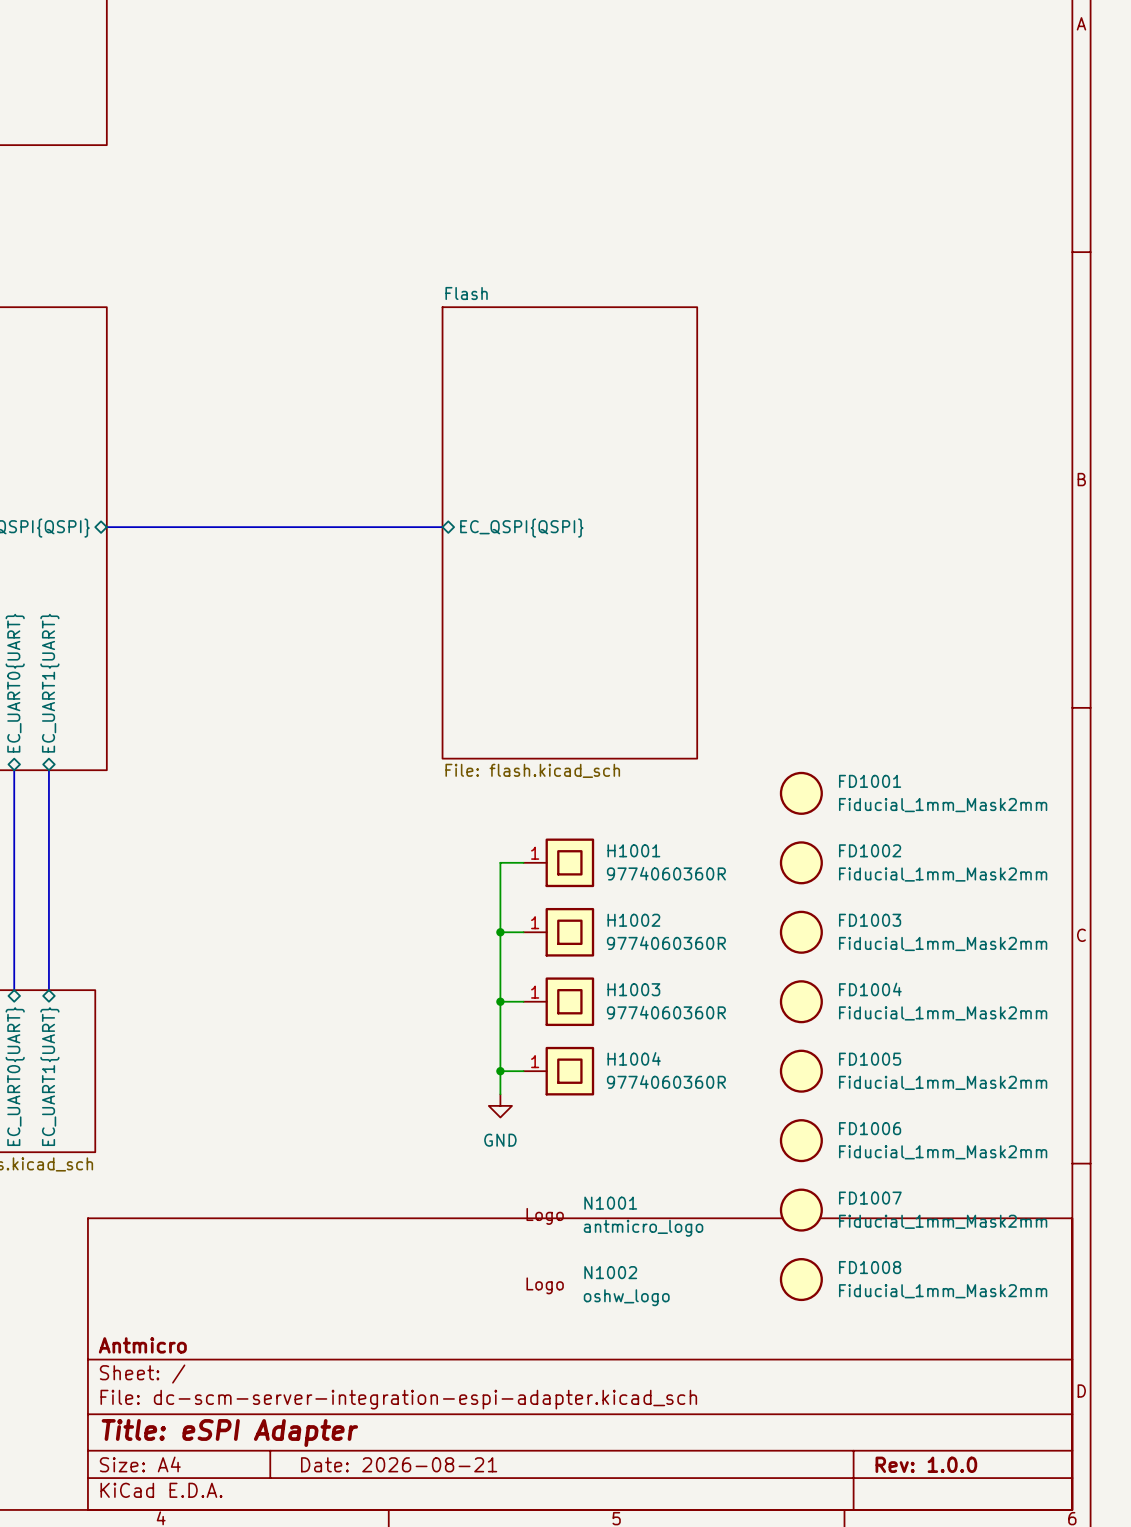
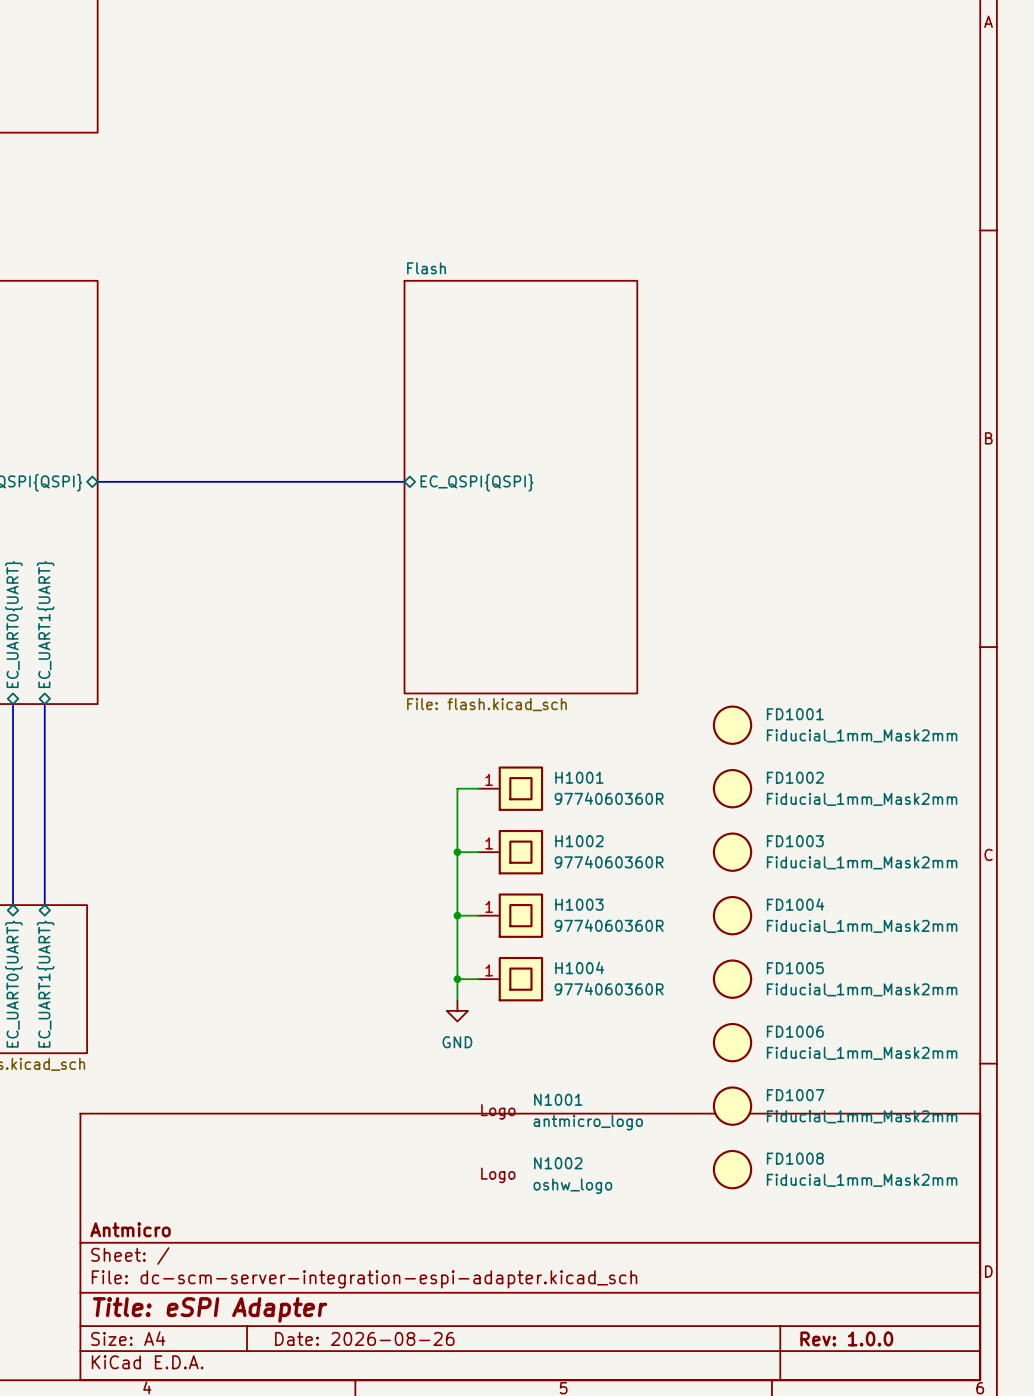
title block: Date: 2026-08-21 (399, 1464) -> Date: 2026-08-26 (364, 1338)

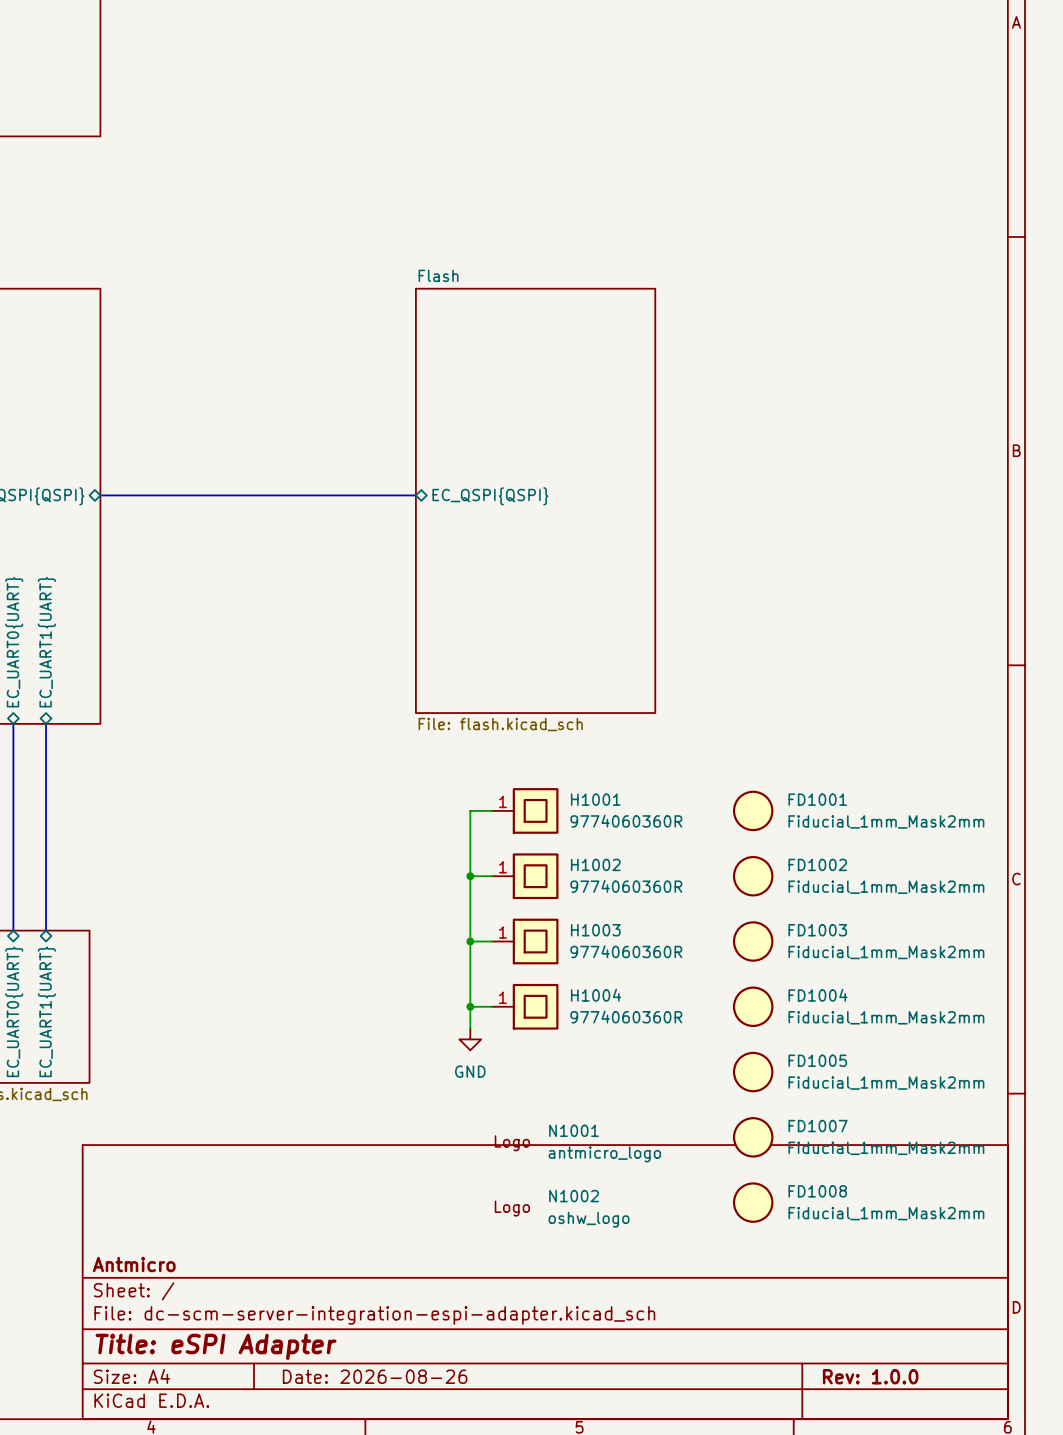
FD1001: Fiducial_1mm_Mask2mm (732, 725) -> none
FD1002 name: FD1002 (795, 777) -> FD1001 (817, 799)
FD1003 name: FD1003 (795, 841) -> FD1002 (817, 864)
FD1004 name: FD1004 (795, 904) -> FD1003 (817, 930)
FD1005 name: FD1005 (795, 968) -> FD1004 (818, 995)
FD1006 name: FD1006 (795, 1031) -> FD1005 (817, 1060)

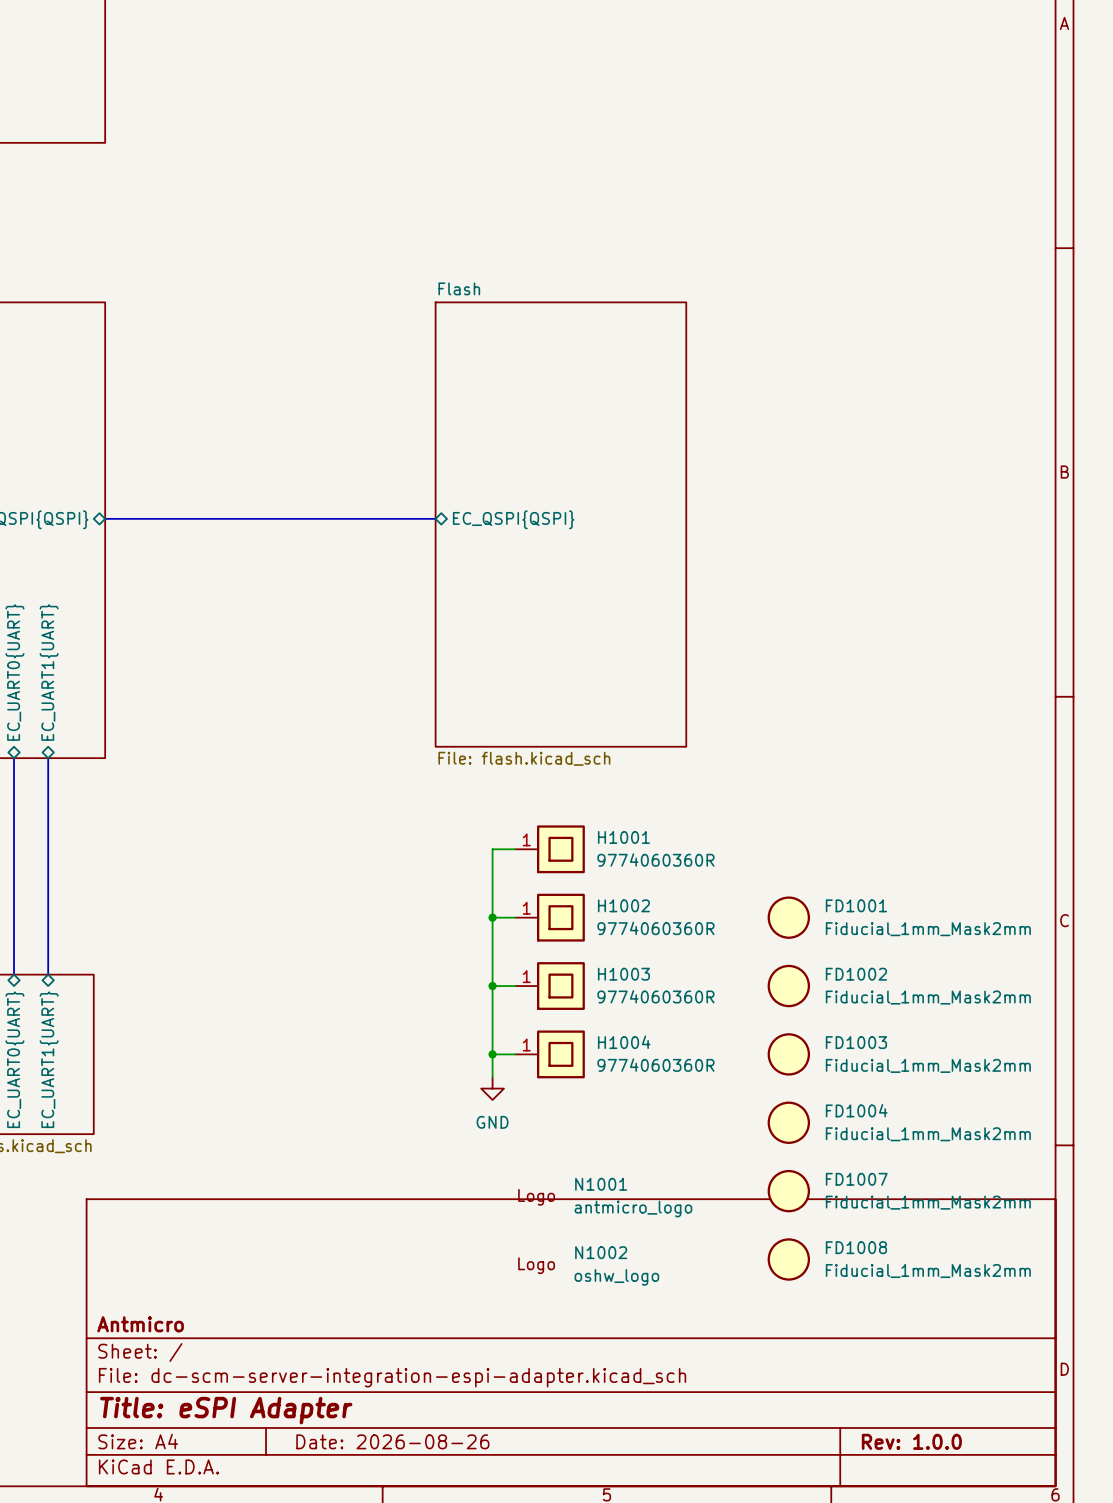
FD1001: Fiducial_1mm_Mask2mm (753, 810) -> none
FD1002 name: FD1002 (817, 864) -> FD1001 (856, 905)
FD1003 name: FD1003 (817, 930) -> FD1002 (856, 974)
FD1004 name: FD1004 (818, 995) -> FD1003 (856, 1042)
FD1005 name: FD1005 (817, 1060) -> FD1004 (856, 1110)

